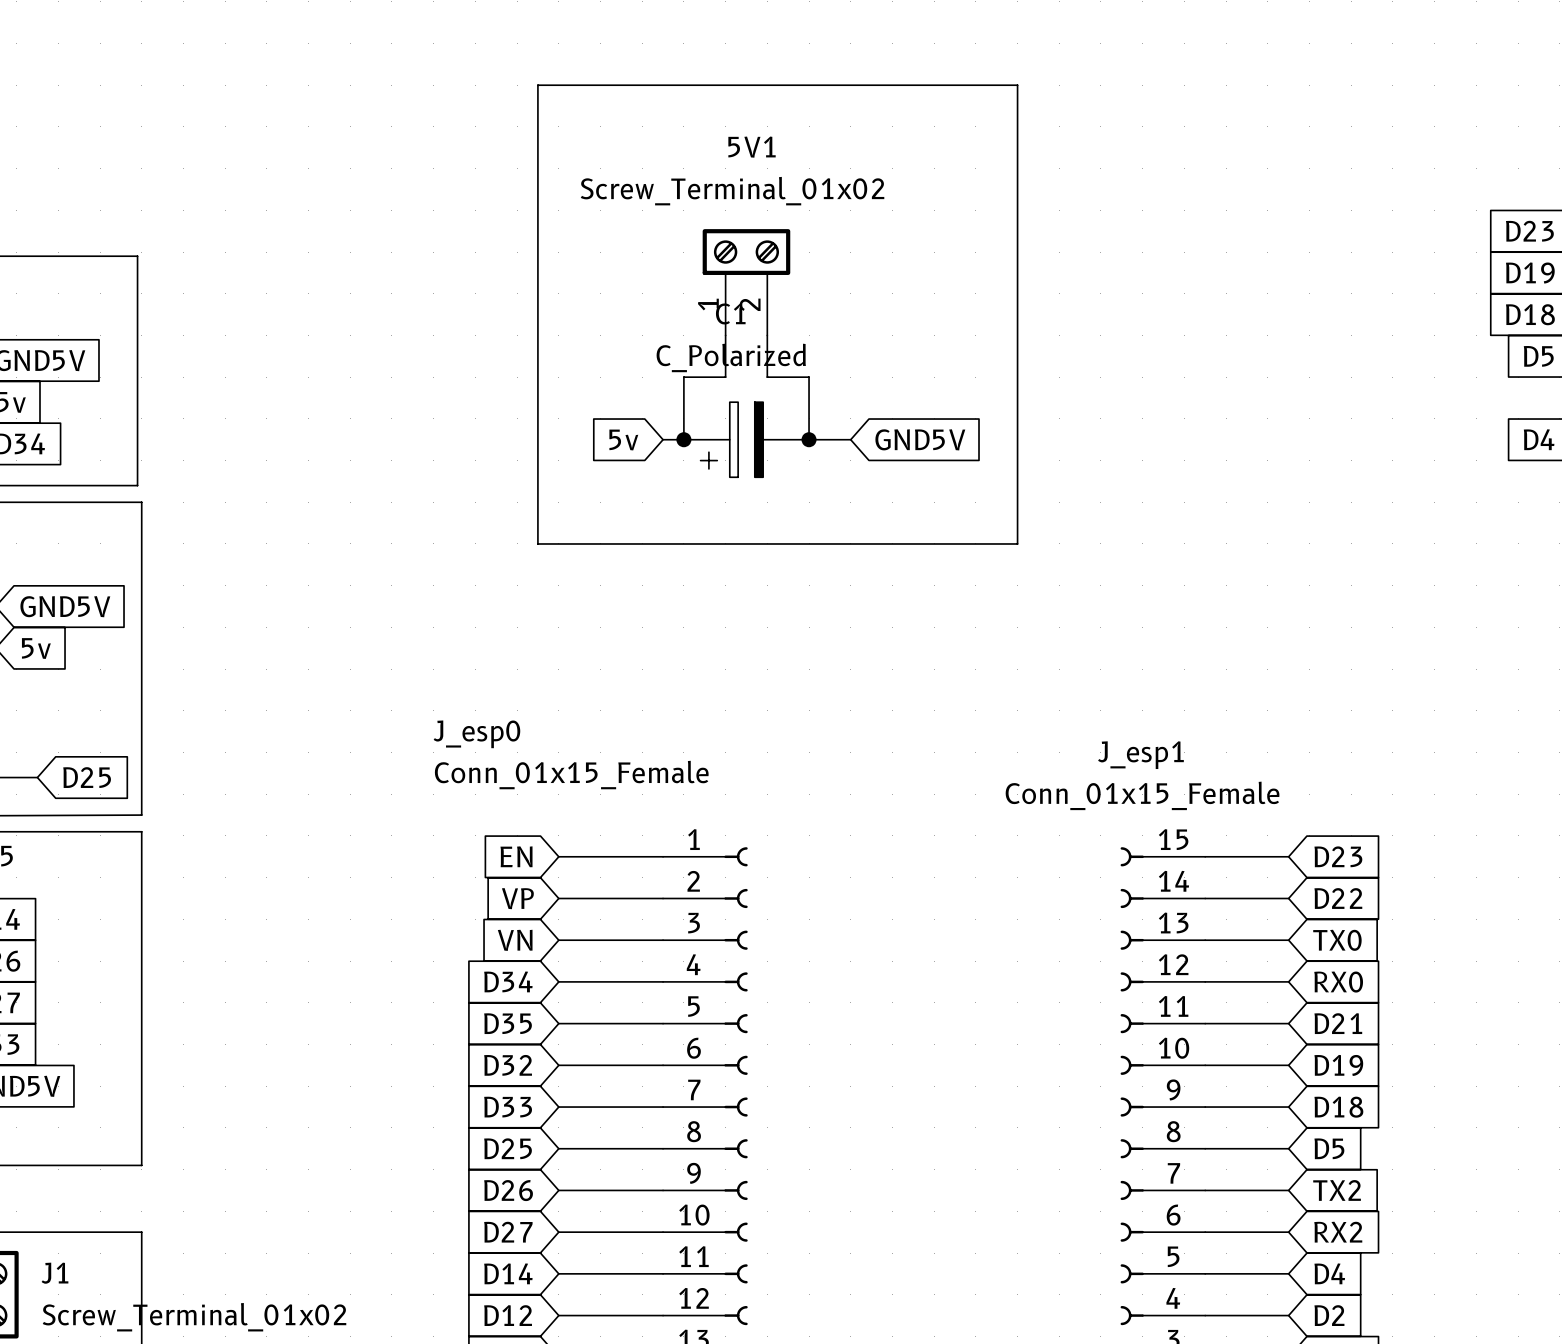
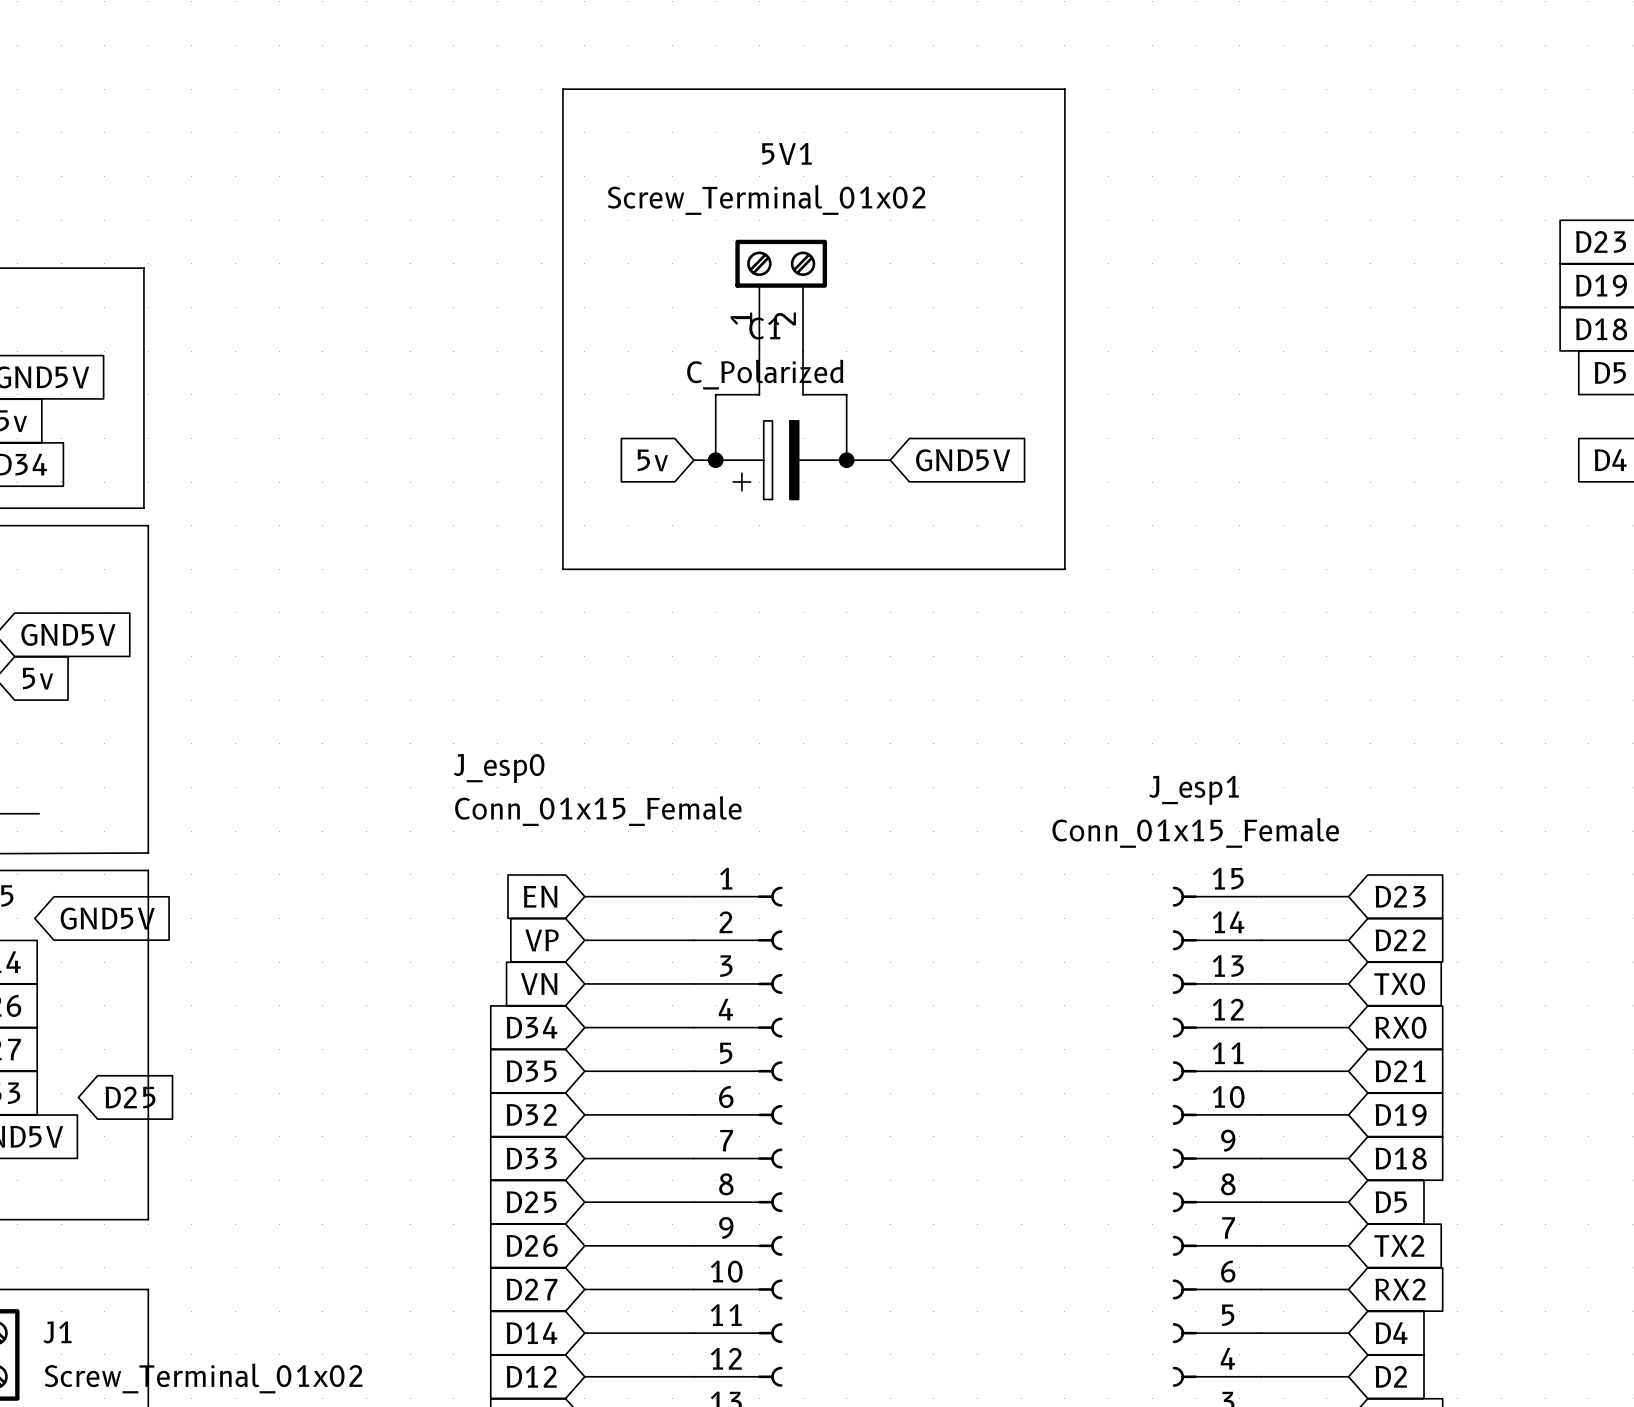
global label position: D25 (87, 777) -> D25 (130, 1097)
global label: none -> GND5V (107, 918)

